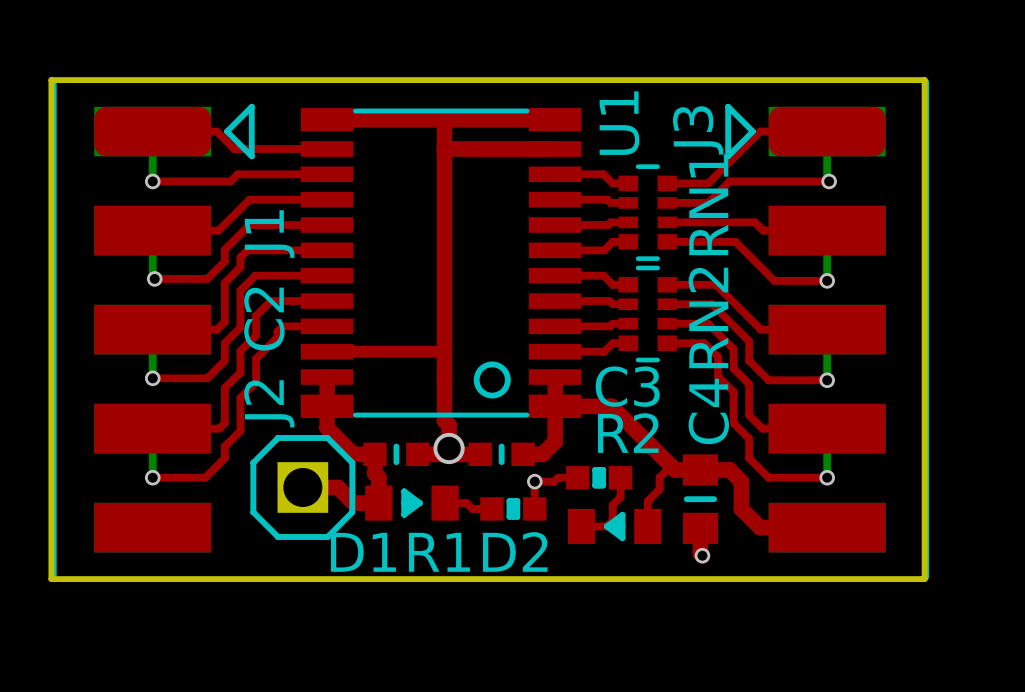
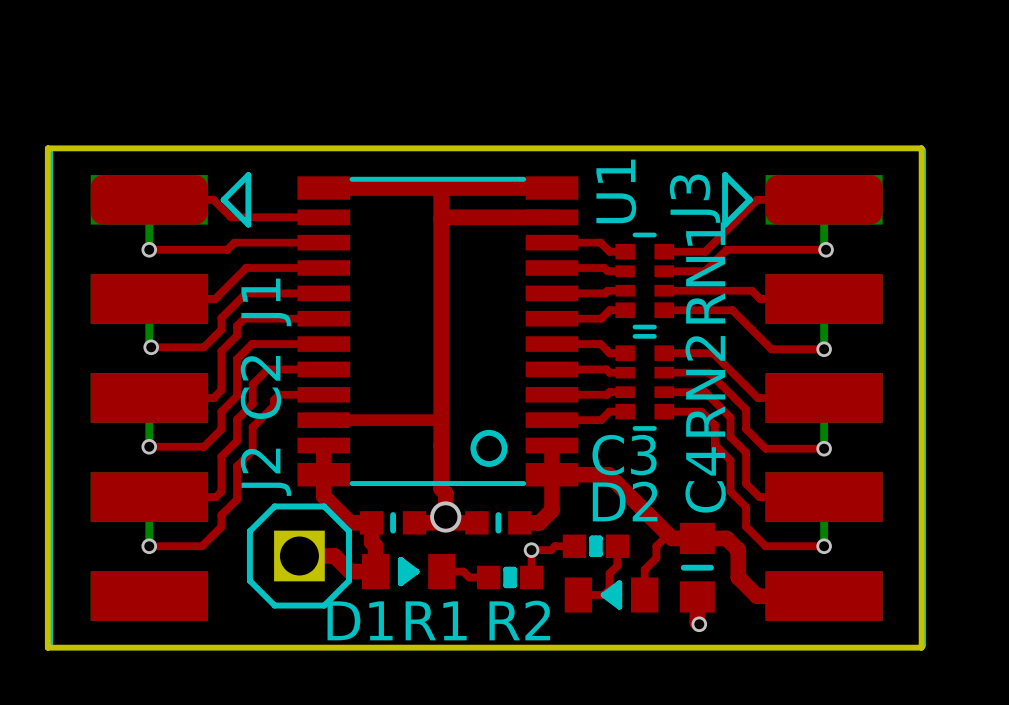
R2 name position: R2 (628, 433) -> R2 (519, 620)
D2 name position: D2 (515, 551) -> D2 (625, 501)

